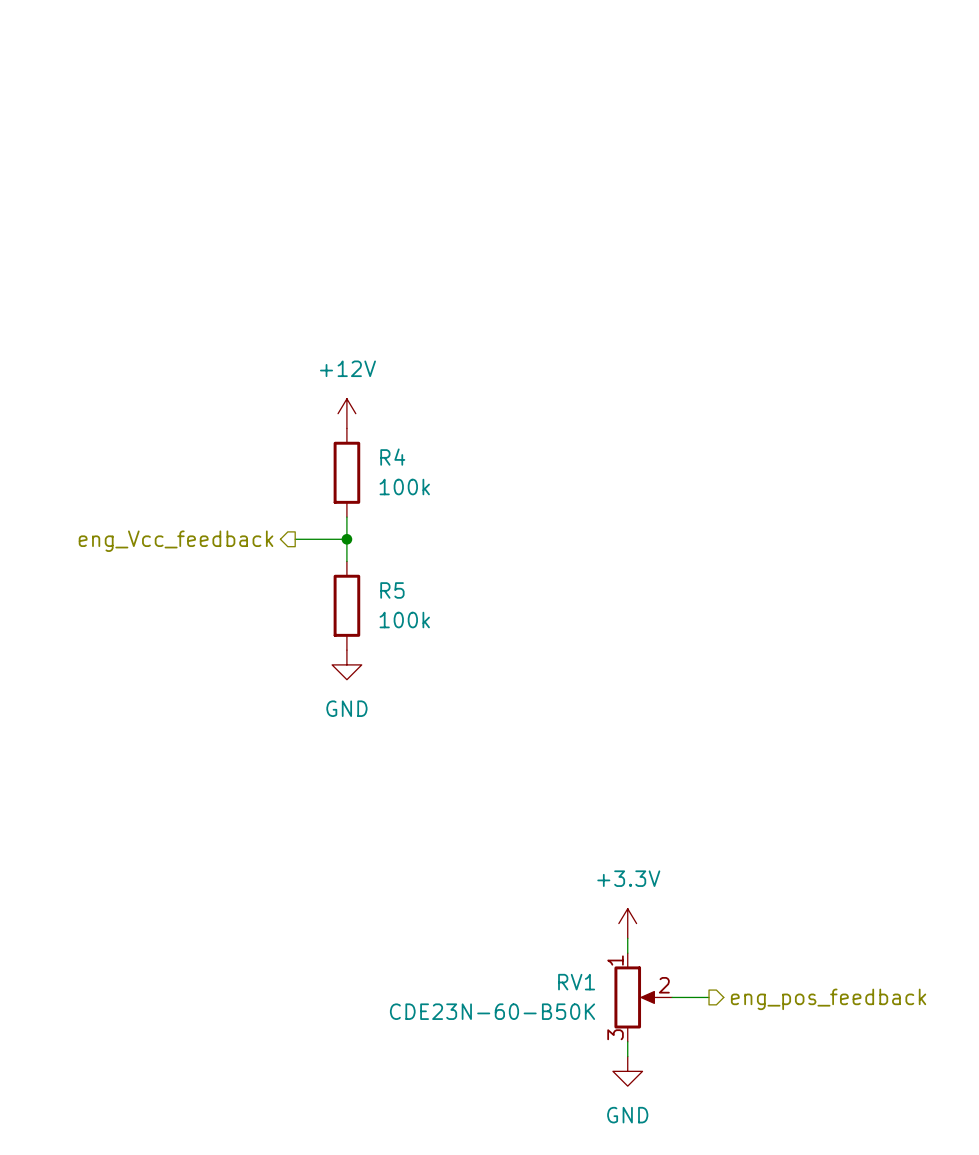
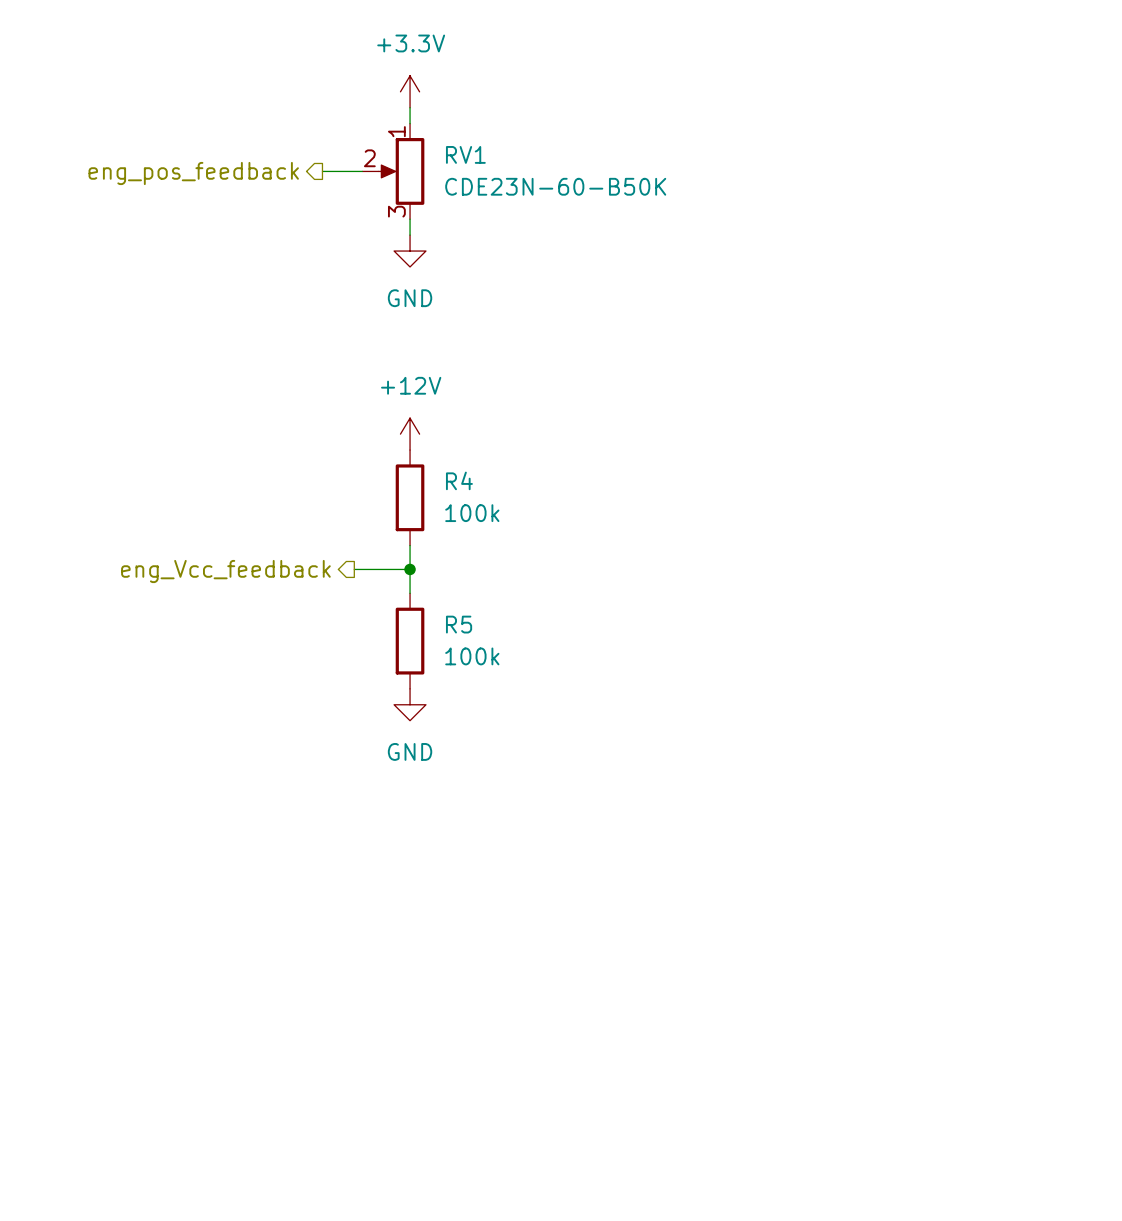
power symbol: none -> +3.3V (410, 91)
wire: none -> (410, 107) (410, 123)
wire: none -> (322, 171) (362, 171)
hierarchical label: none -> eng_pos_feedback (193, 173)
wire: none -> (410, 219) (410, 235)
power symbol: none -> GND (410, 251)
power symbol: +3.3V (627, 923) -> none
wire: (627, 938) (627, 953) -> none
RV1 flip: as is (635, 997) -> left-right (401, 171)
RV1 position: (643, 997) -> (393, 171)
wire: (672, 997) (709, 997) -> none
hierarchical label: eng_pos_feedback (828, 999) -> none
wire: (627, 1041) (627, 1056) -> none
power symbol: GND (627, 1071) -> none

